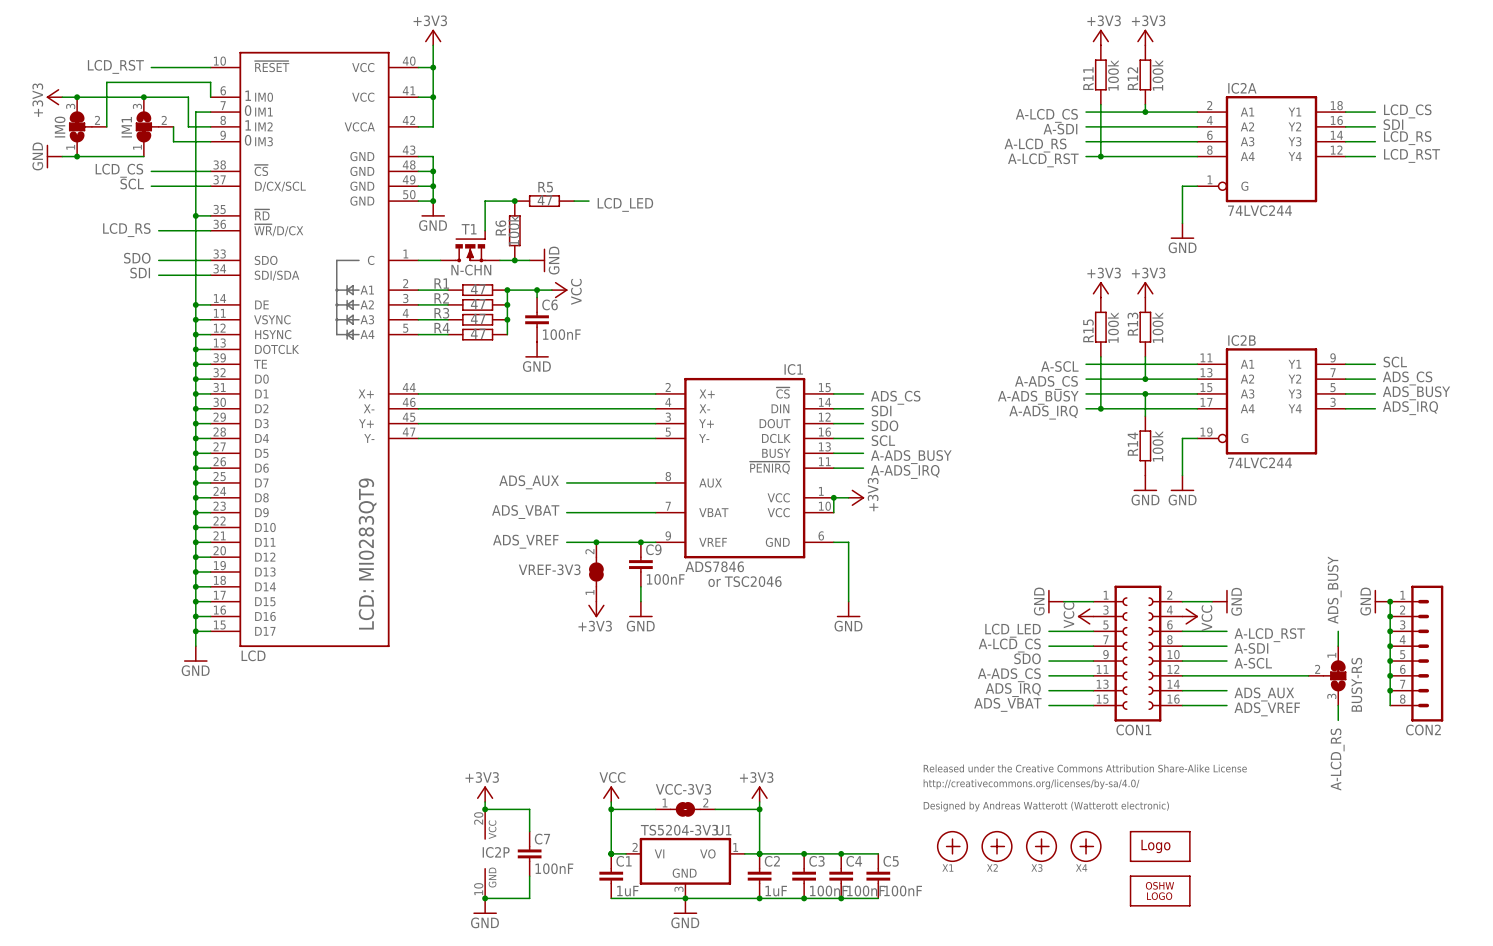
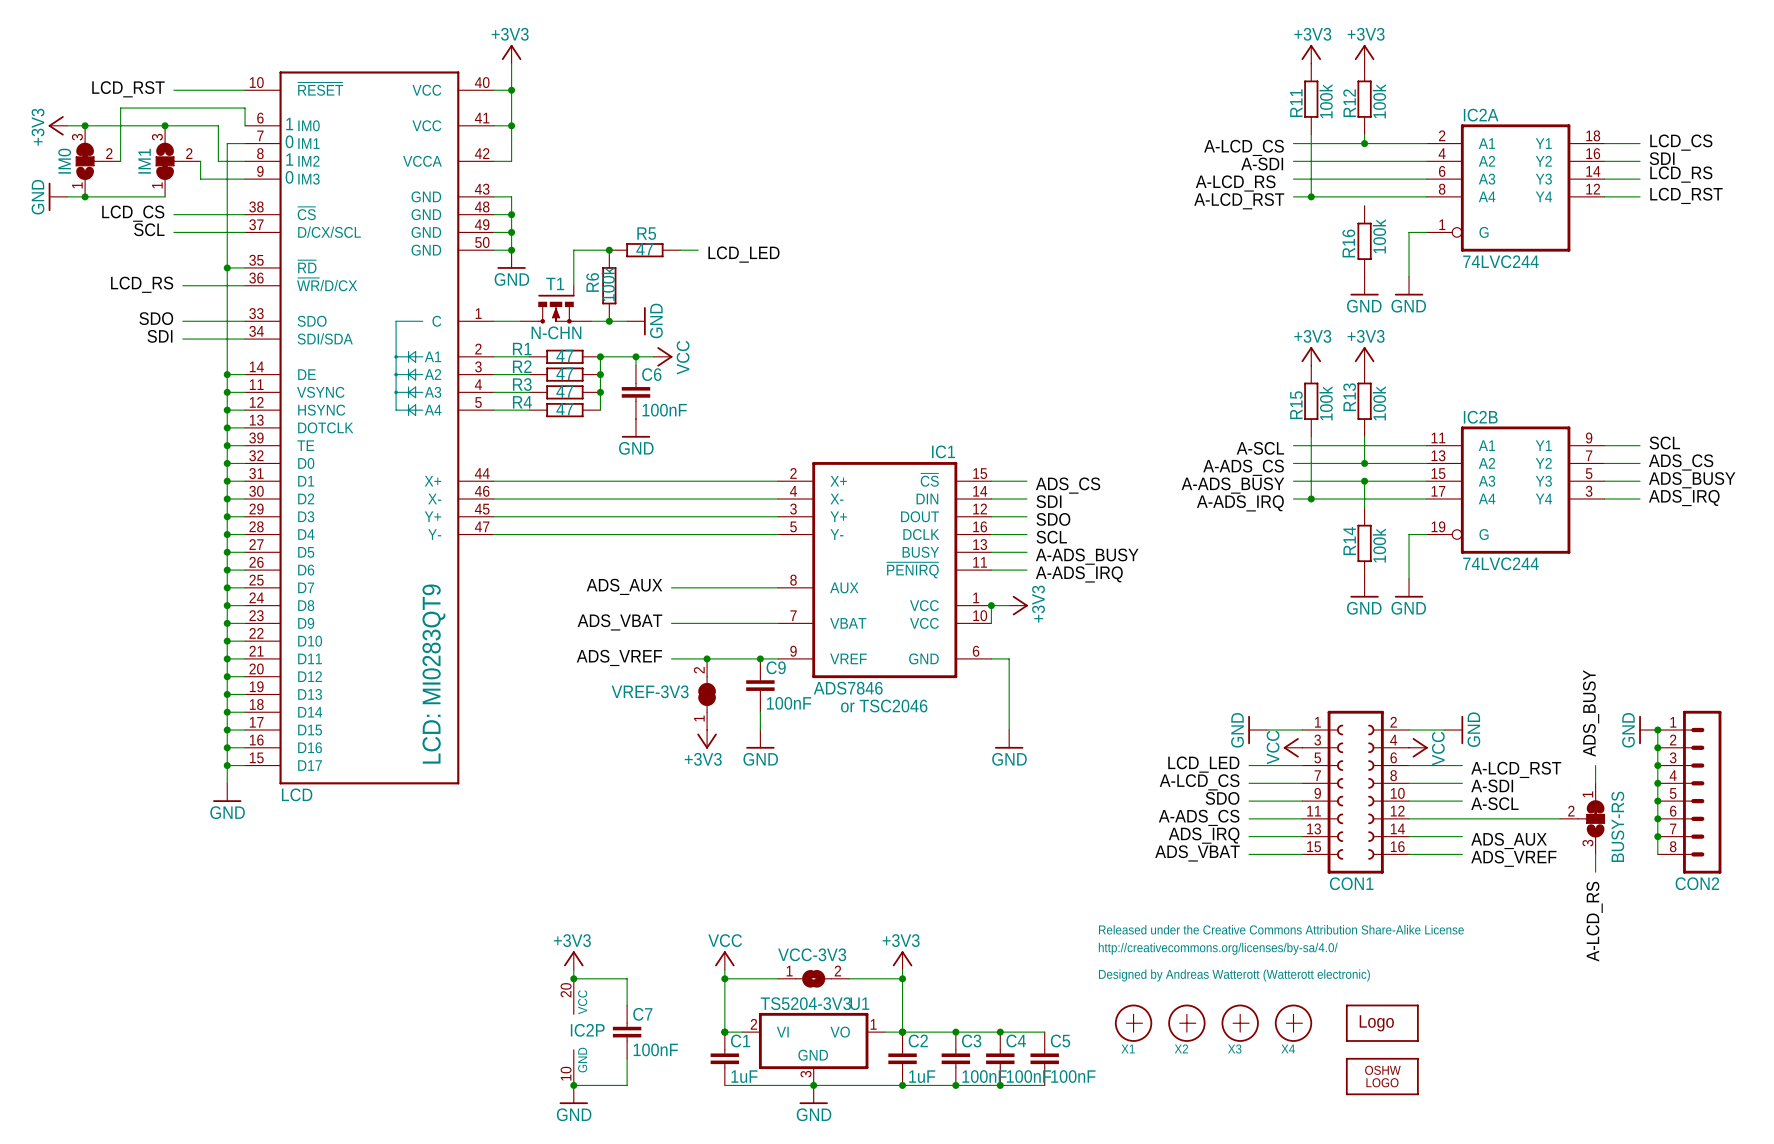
R16: none -> 100k (1364, 241)
power symbol: none -> GND (1364, 286)

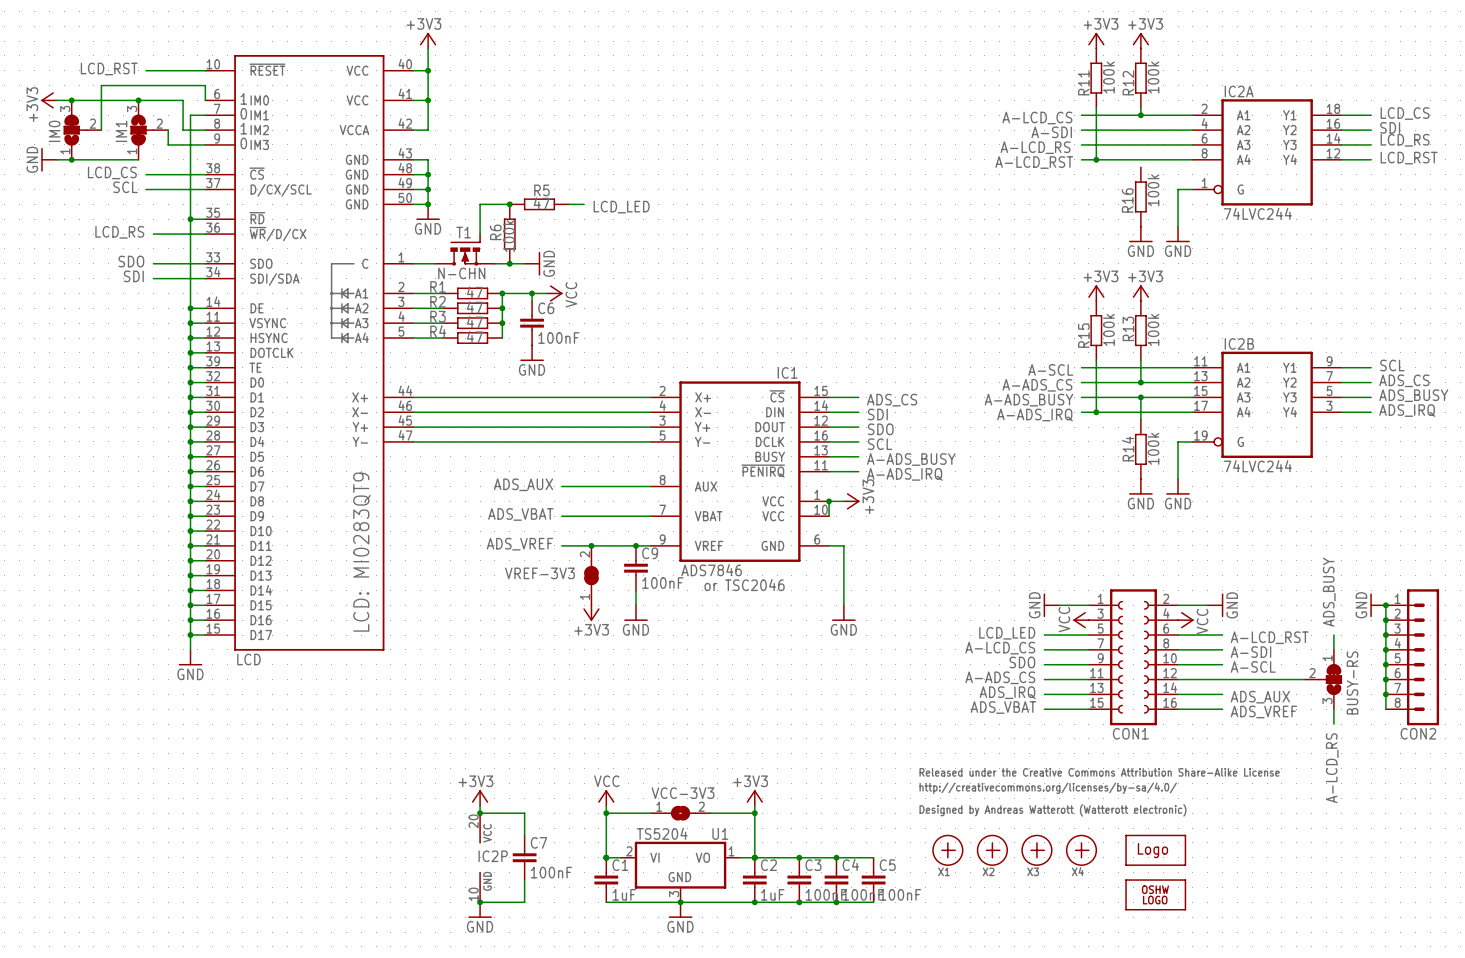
U1 value: TS5204-3V3 (805, 1003) -> TS5204 (662, 833)

